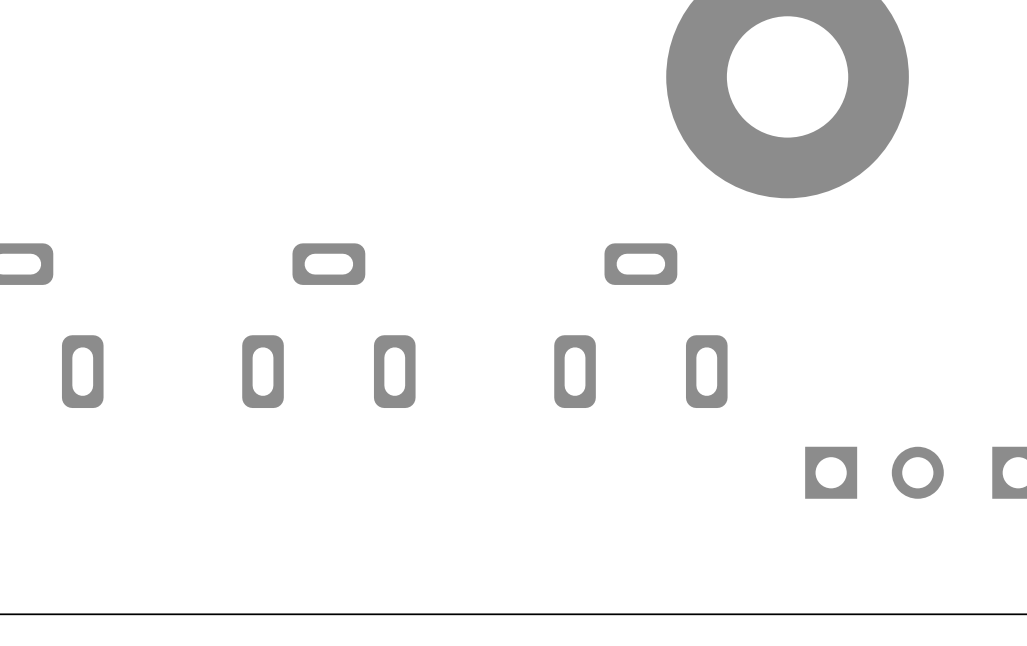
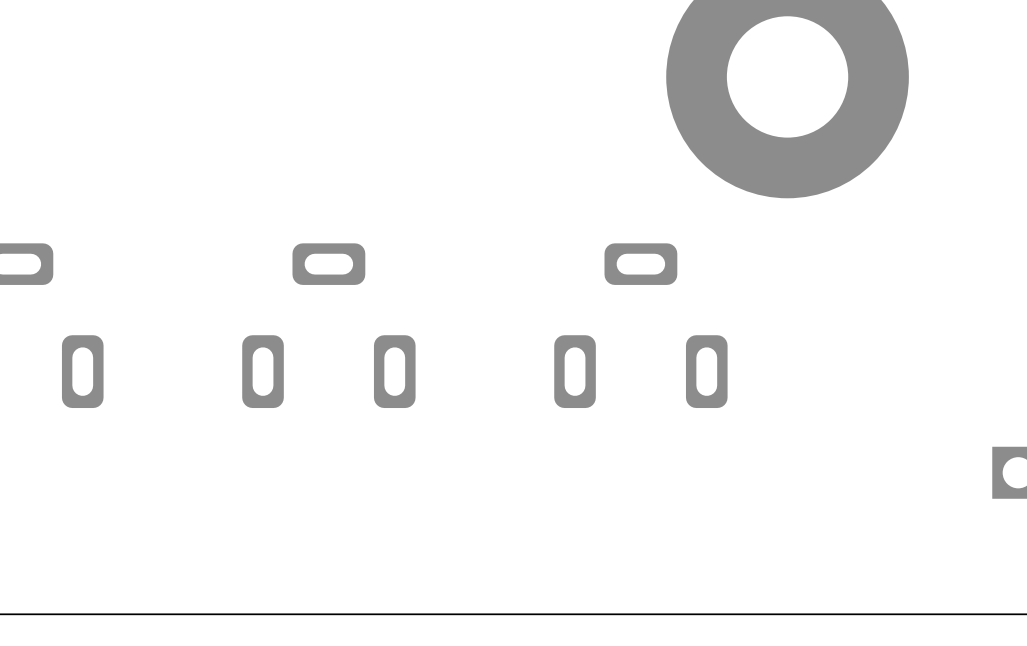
part: (874, 472) -> none

